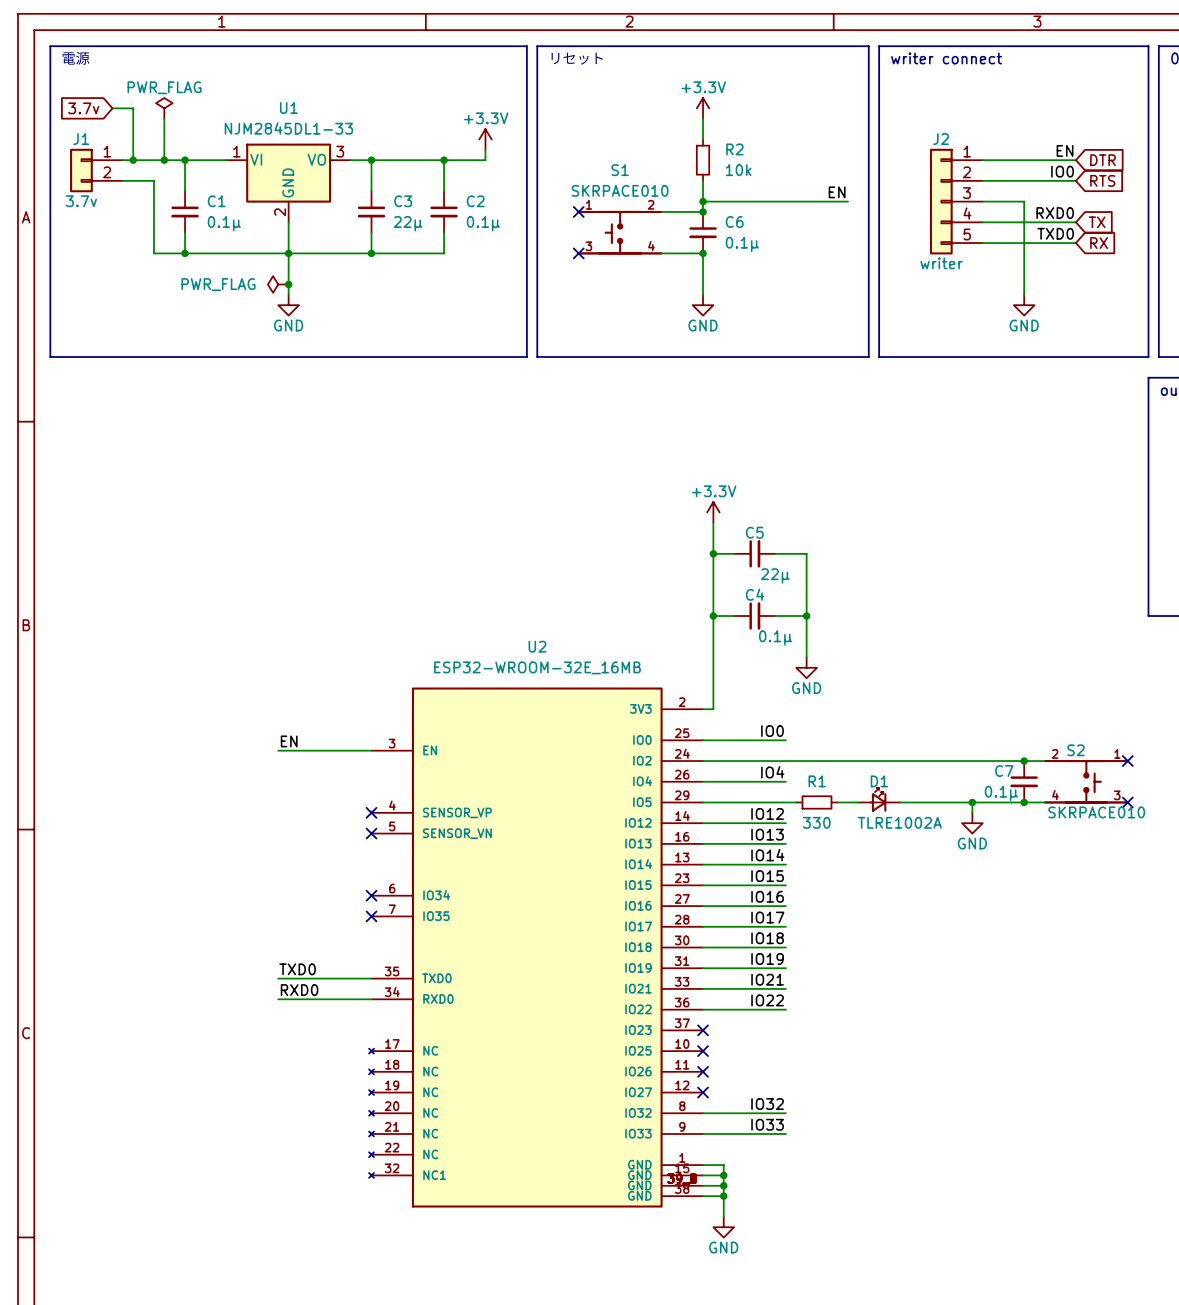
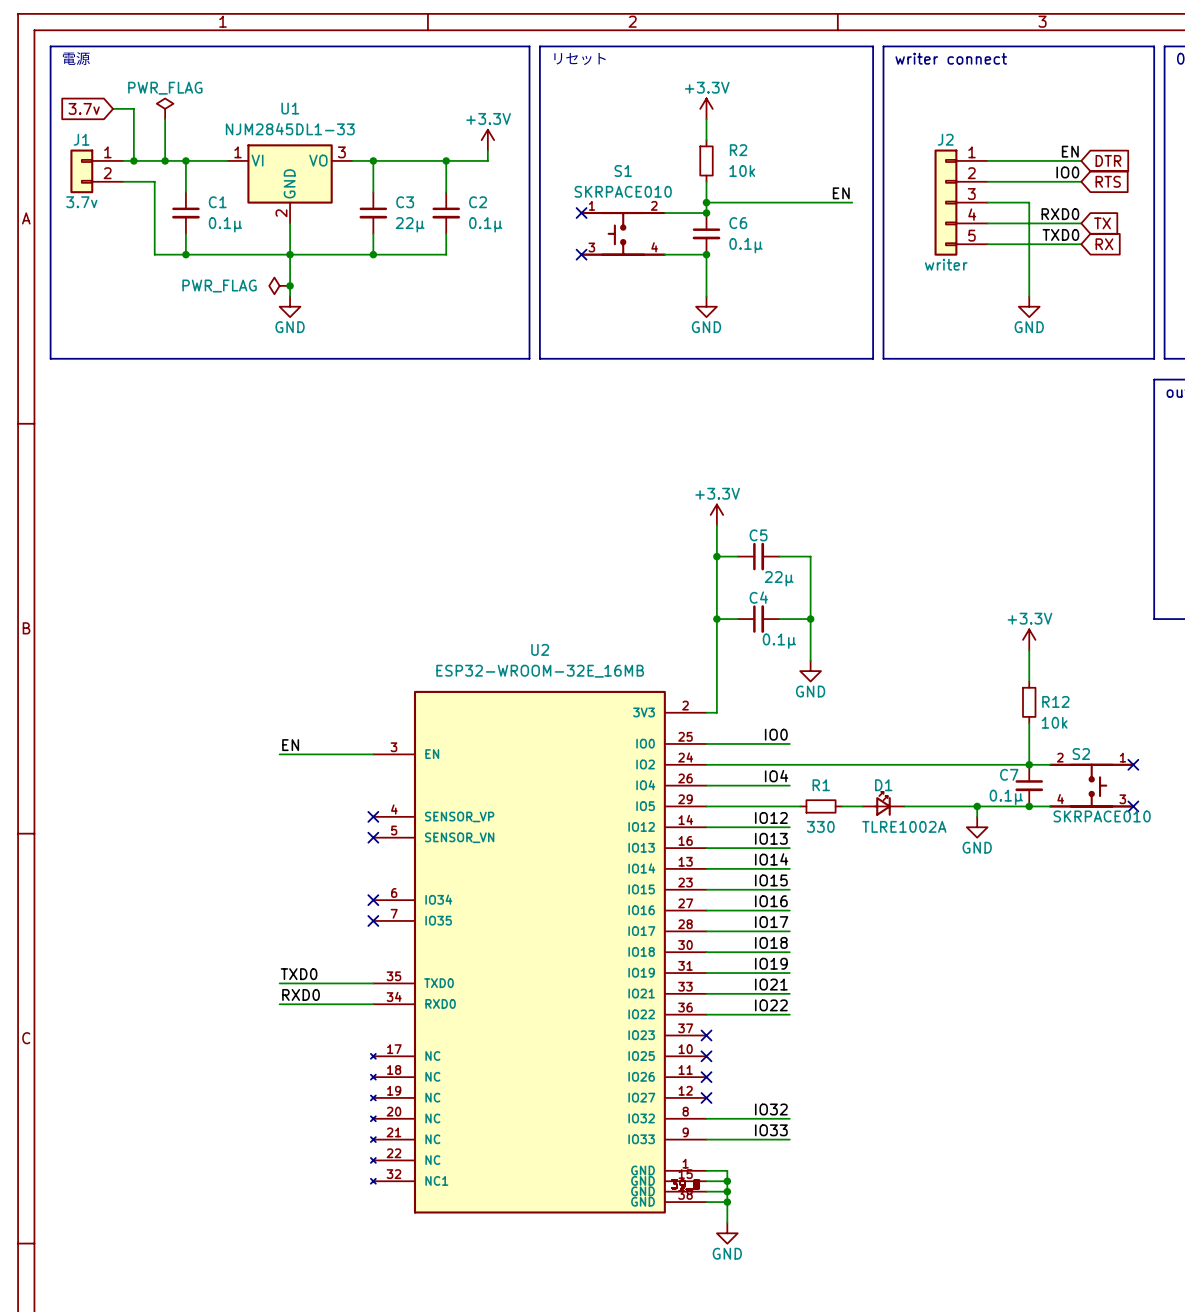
power symbol: none -> +3.3V (1029, 639)
wire: none -> (1029, 650) (1029, 681)
R12: none -> 10k (1029, 702)
wire: none -> (1029, 723) (1029, 764)

